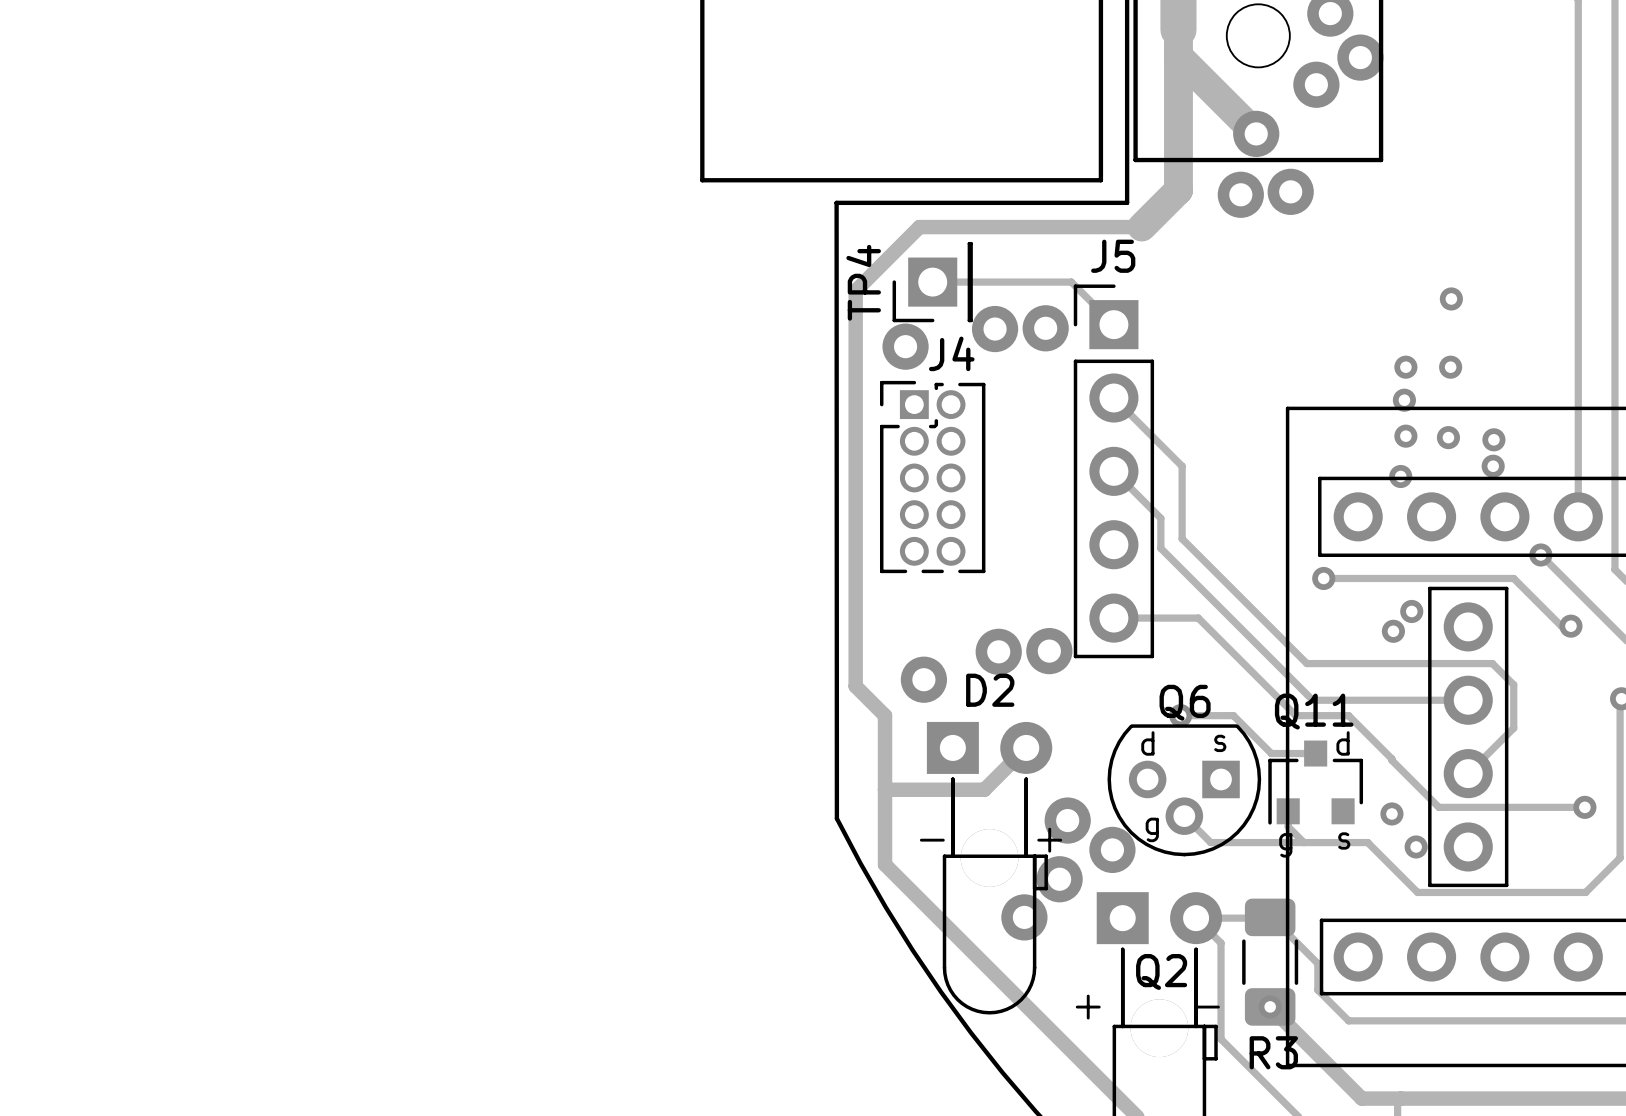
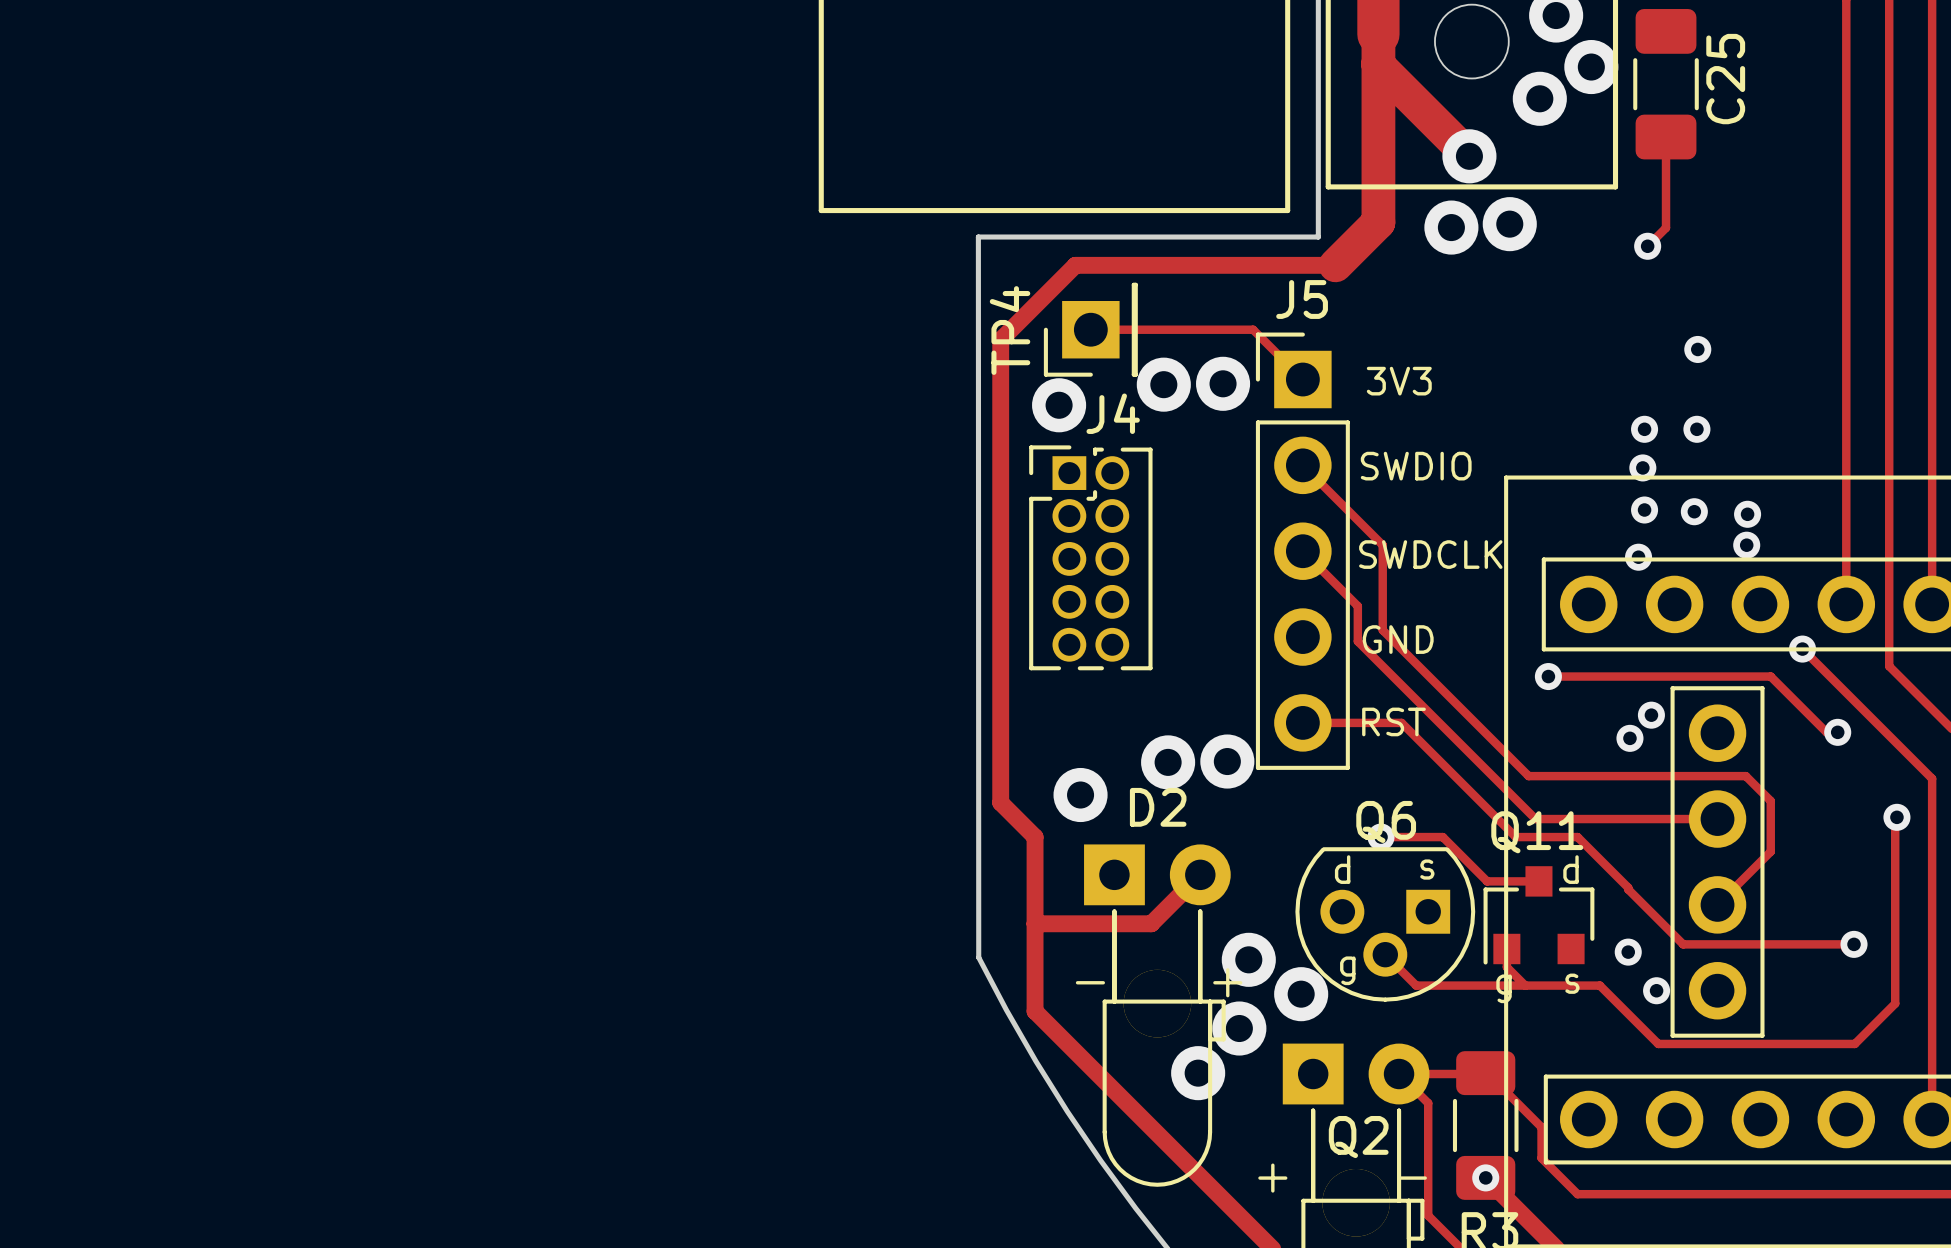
C25: none -> (1666, 84)
track: none -> (1666, 137) (1666, 227) (1647, 246)
via: none -> (1647, 246)
text: none -> 3V3 (1399, 381)
text: none -> SWDIO (1416, 466)
text: none -> SWDCLK (1430, 554)
text: none -> GND (1398, 639)
text: none -> RST (1393, 721)

